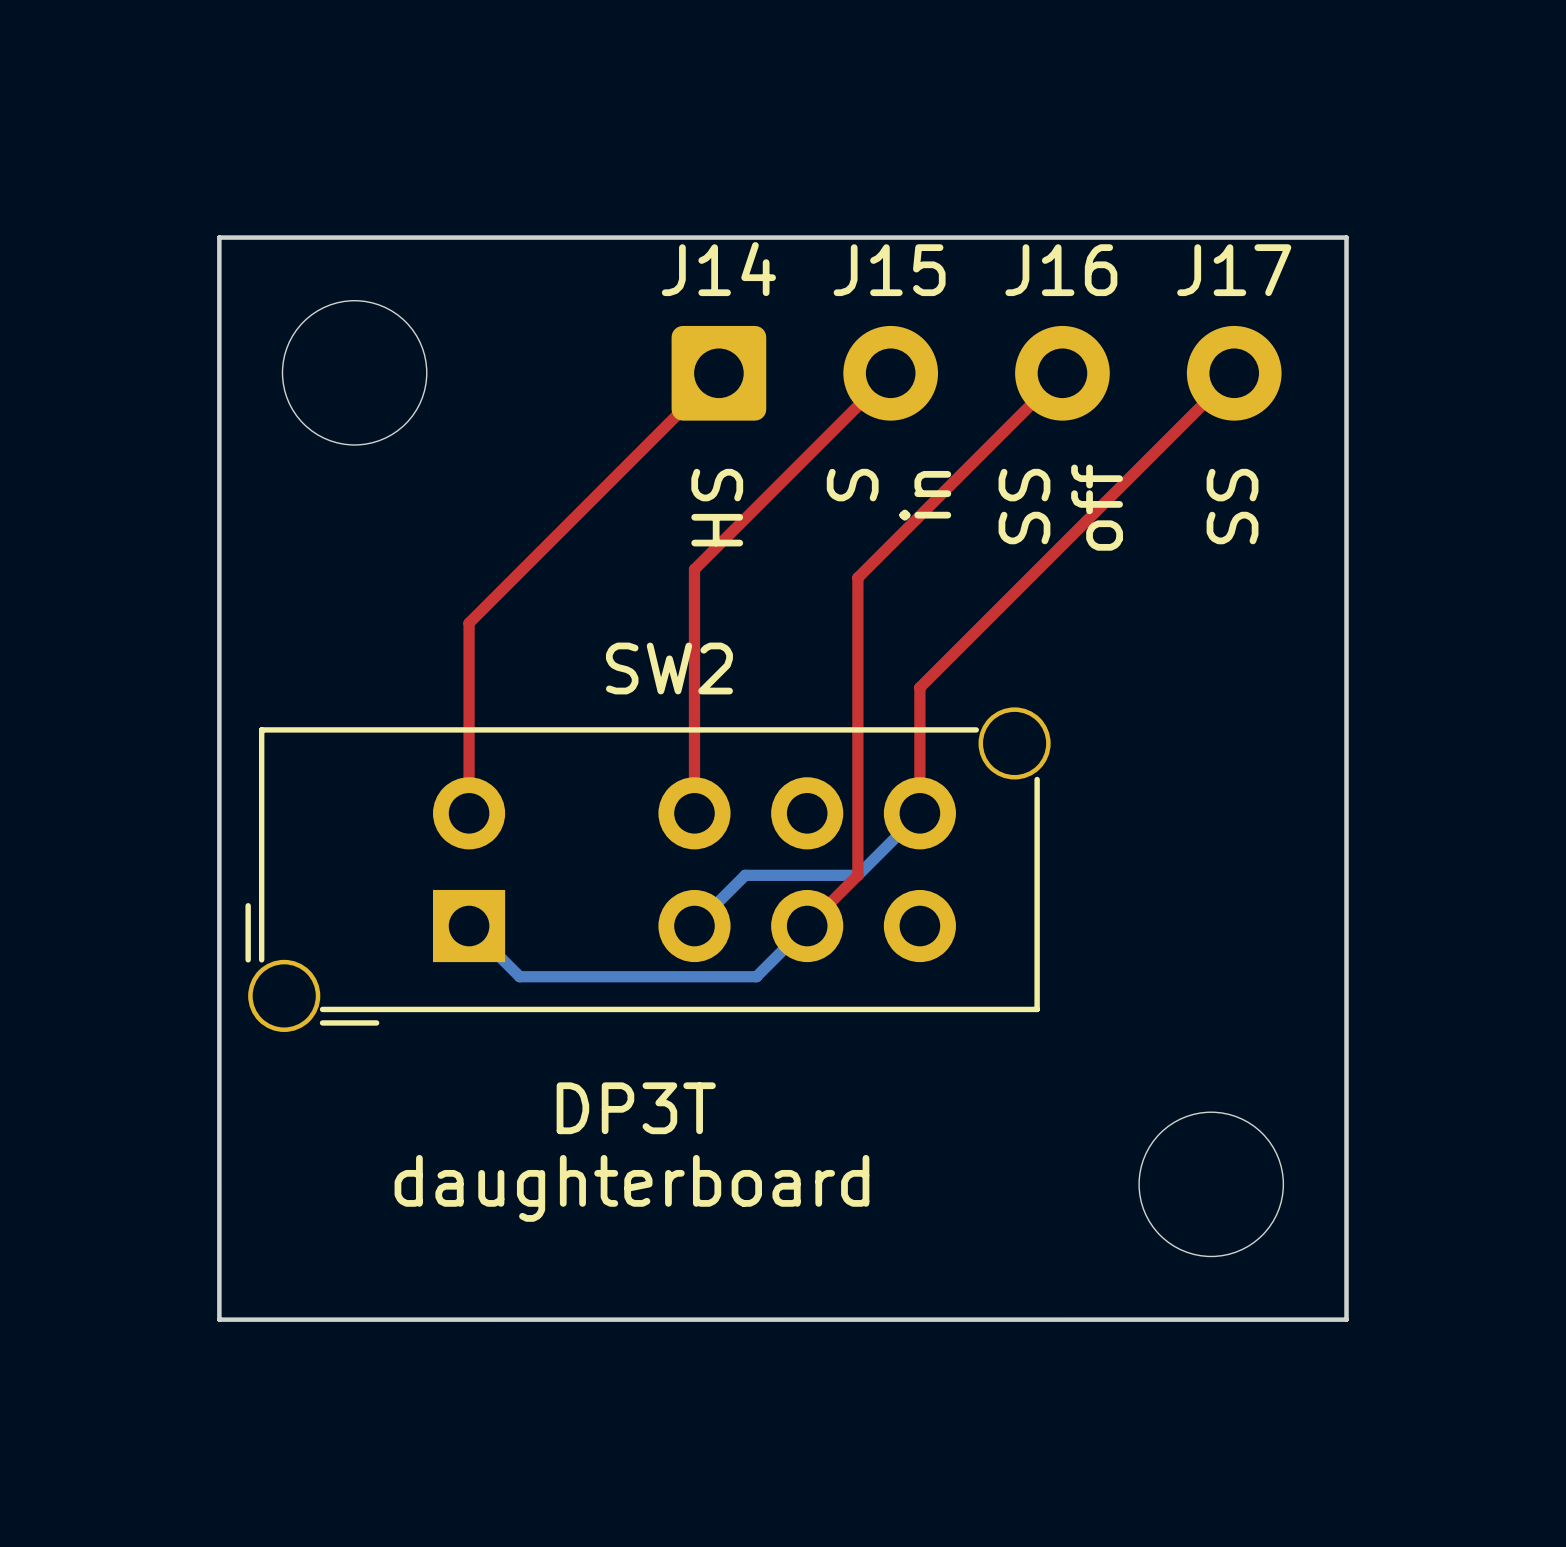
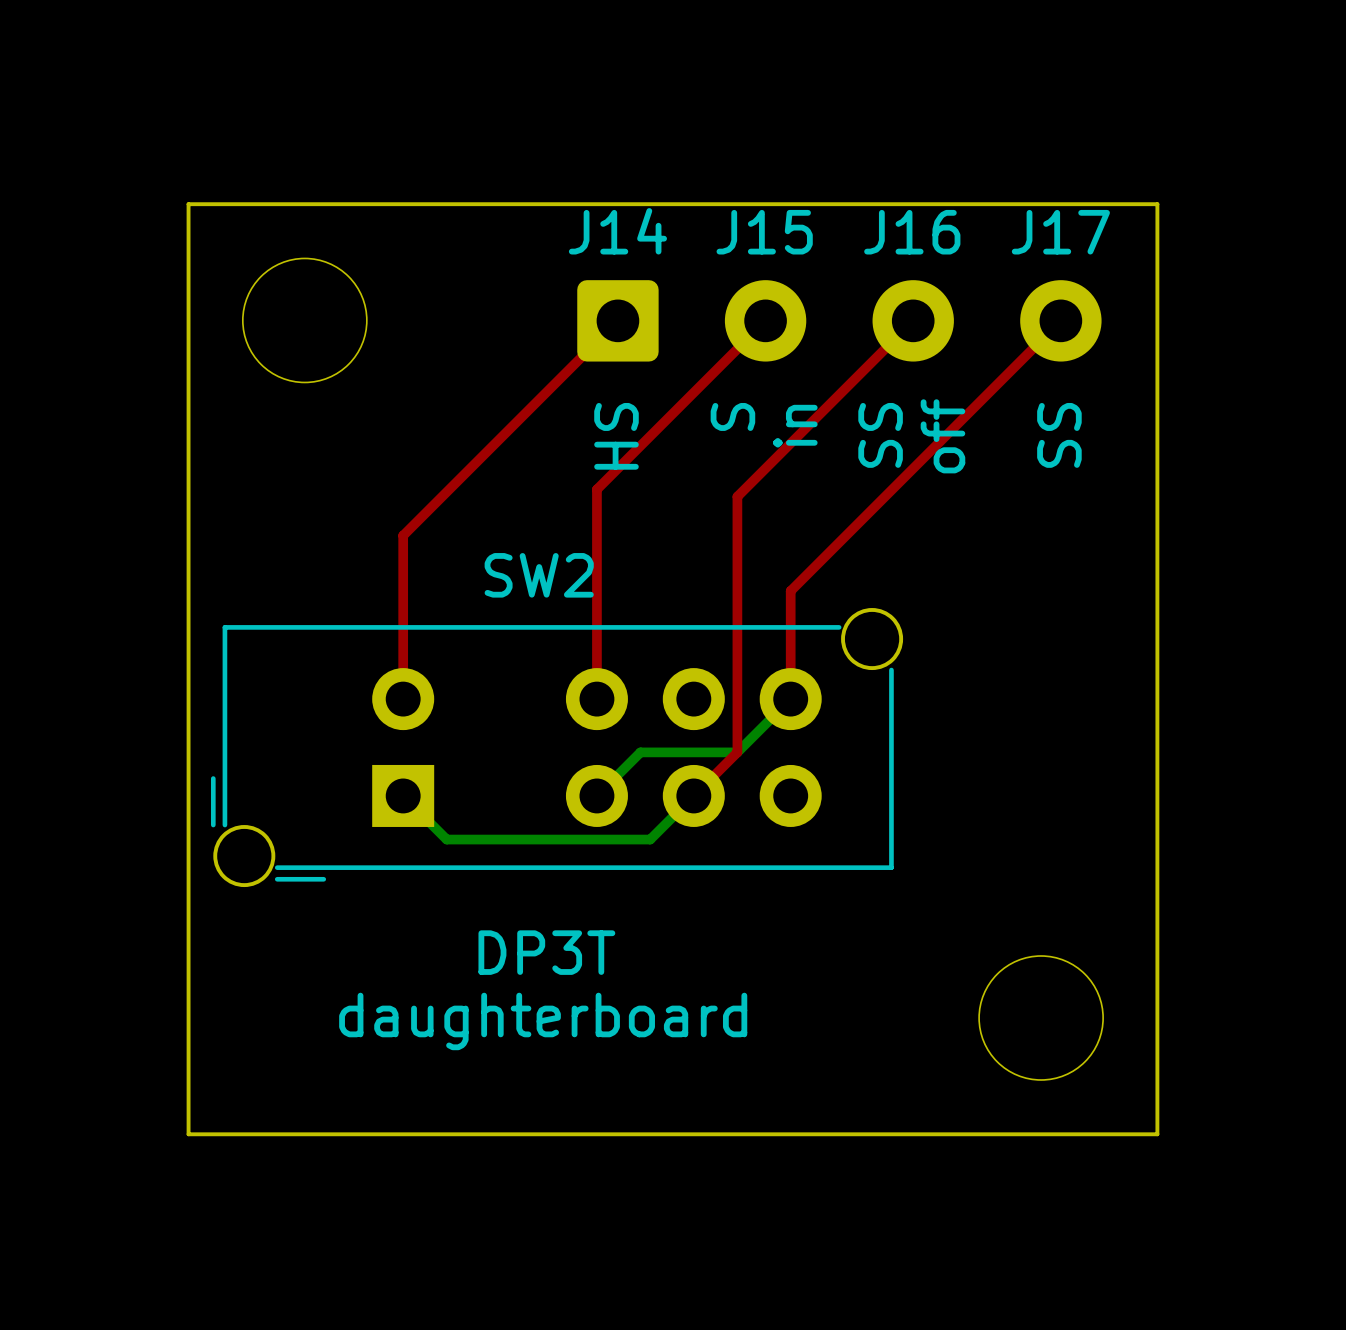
SW2 name position: SW2 (669, 668) -> SW2 (539, 575)

